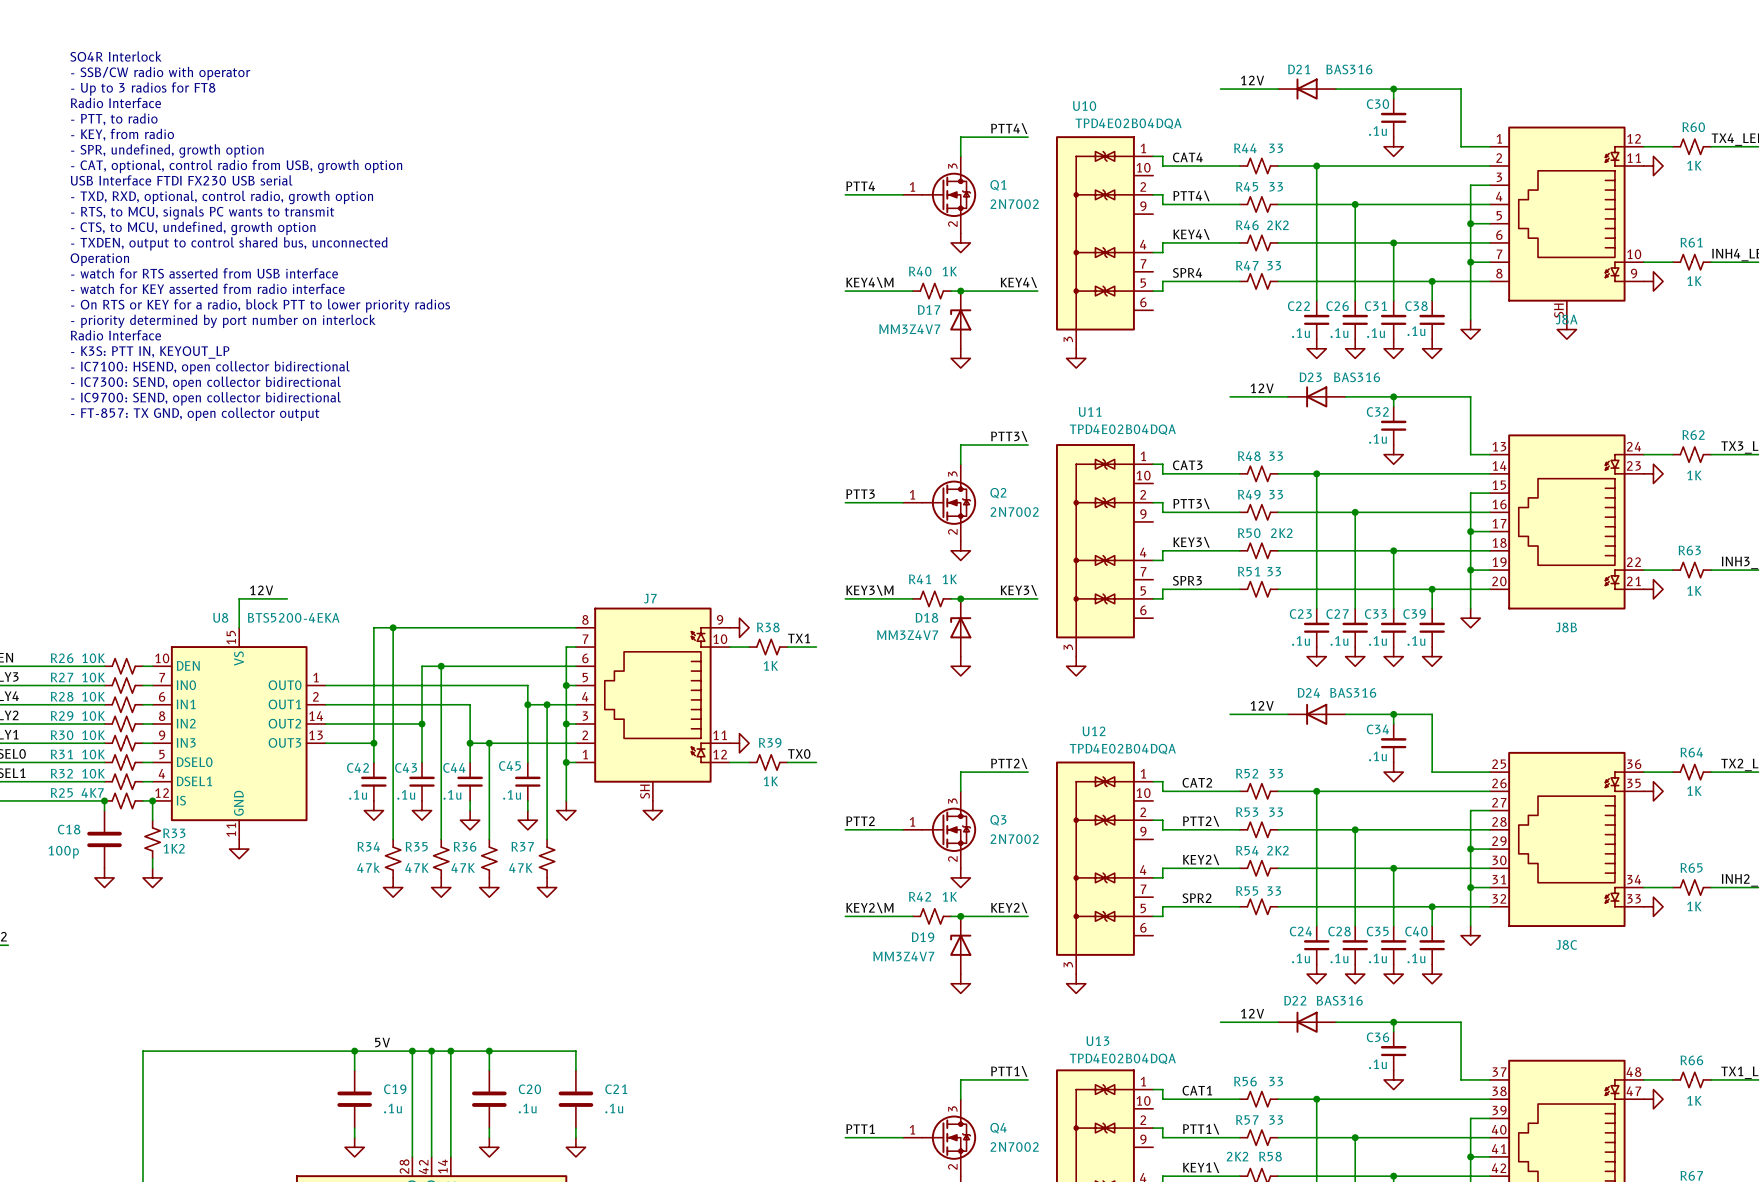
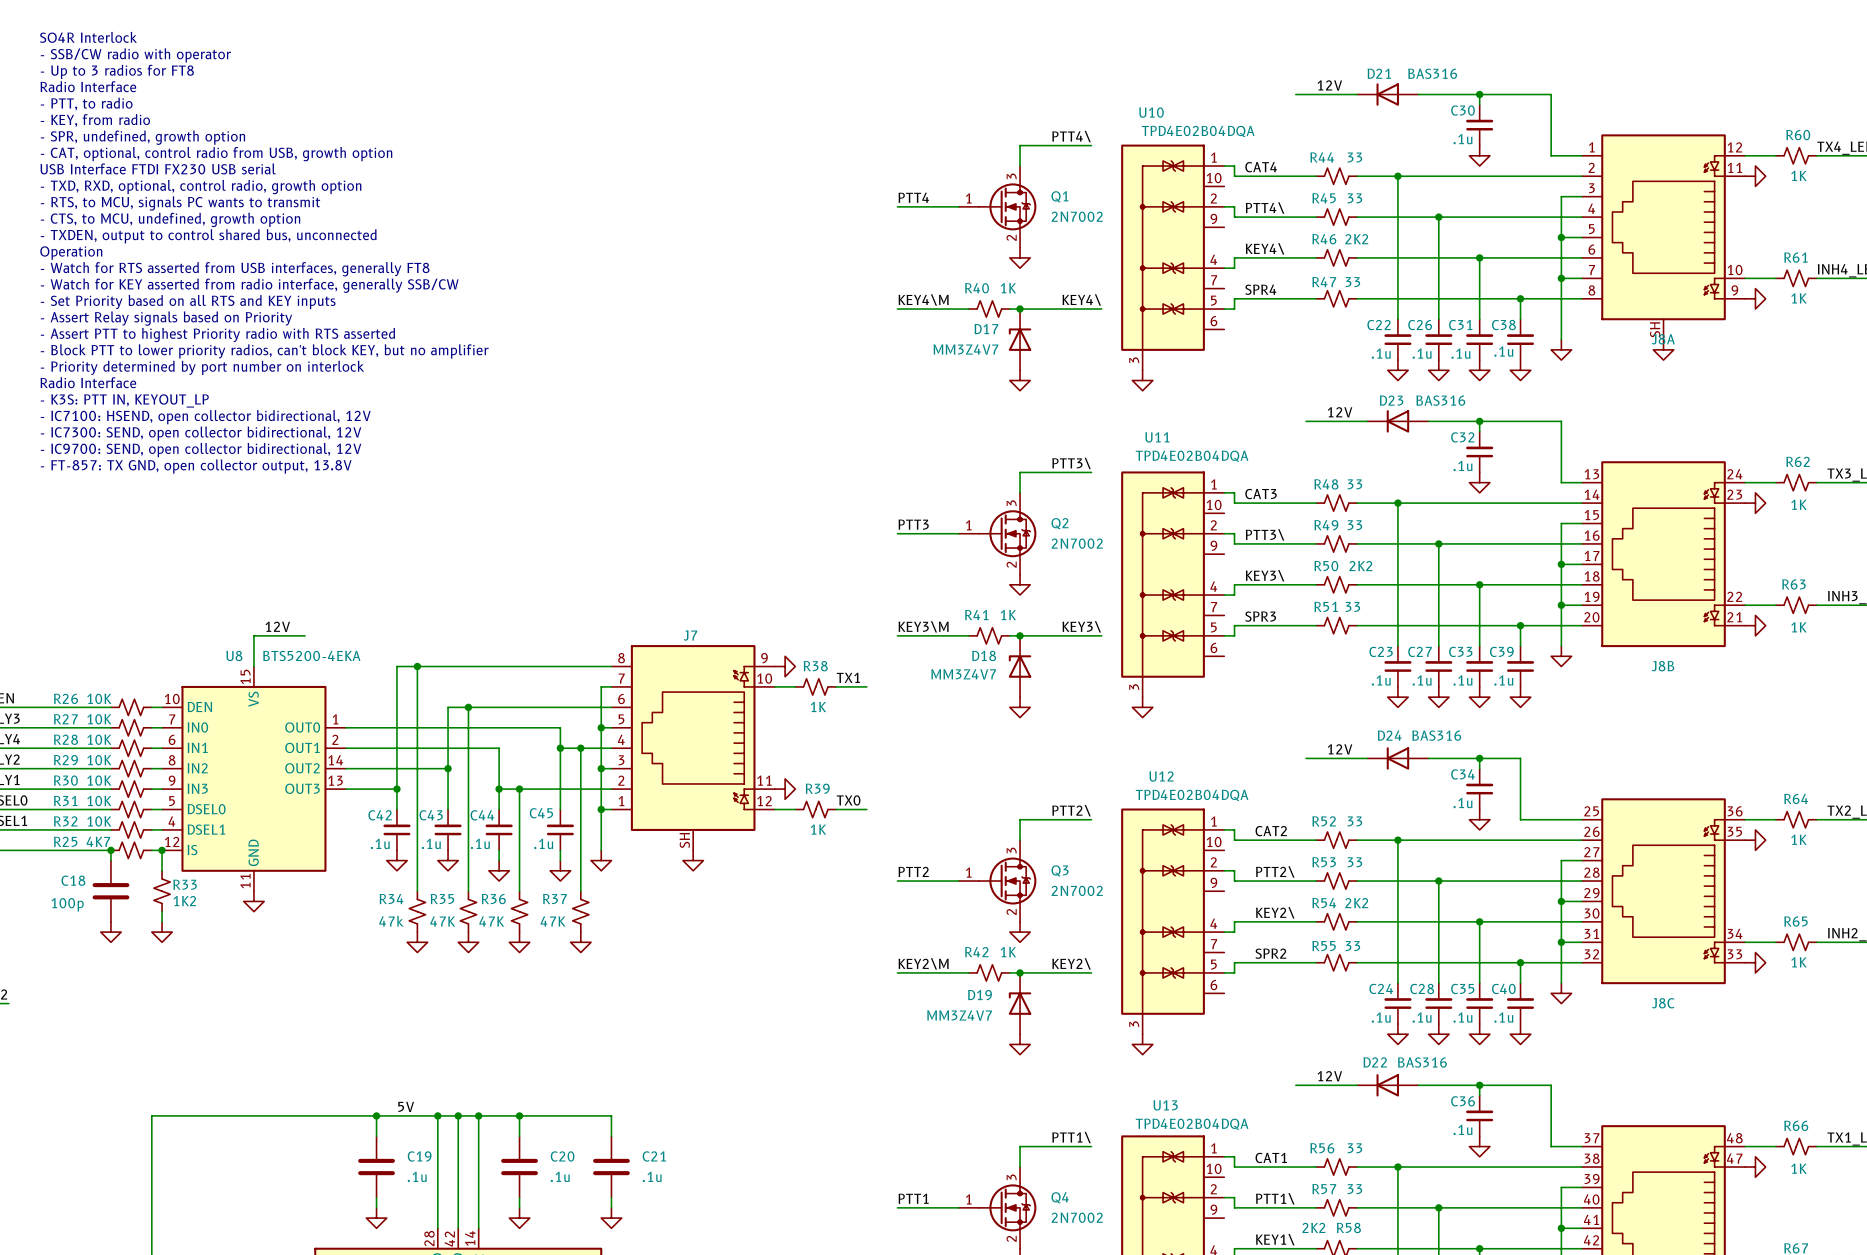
text position: SO4R Interlock (116, 56) -> SO4R Interlock (88, 37)
text position: - SSB/CW radio with operator (160, 73) -> - SSB/CW radio with operator (135, 55)
text position: - Up to 3 radios for FT8 (143, 89) -> - Up to 3 radios for FT8 (117, 71)
text position: Radio Interface (115, 102) -> Radio Interface (88, 86)
text position: - PTT, to radio (114, 119) -> - PTT, to radio (86, 104)
text position: - KEY, from radio (122, 134) -> - KEY, from radio (95, 120)
text position: - SPR, undefined, growth option (167, 151) -> - SPR, undefined, growth option (142, 137)
text position: - CAT, optional, control radio from USB, growth option (236, 166) -> - CAT, optional, control radio from USB, growth option (216, 154)
text position: USB Interface FTDI FX230 USB serial (181, 180) -> USB Interface FTDI FX230 USB serial (158, 168)
text position: - TXD, RXD, optional, control radio, growth option (222, 197) -> - TXD, RXD, optional, control radio, growth option (201, 187)
text position: - RTS, to MCU, signals PC wants to transmit (202, 212) -> - RTS, to MCU, signals PC wants to transmit (180, 203)
text position: - CTS, to MCU, undefined, growth option (193, 228) -> - CTS, to MCU, undefined, growth option (170, 219)
text position: - TXDEN, output to control shared bus, unconnected (229, 243) -> - TXDEN, output to control shared bus, unconnected (208, 236)
text: none -> - Watch for RTS asserted from USB interfaces, generally FT8 (235, 269)
text position: Operation (99, 259) -> Operation (71, 253)
text: - watch for RTS asserted from USB interface (204, 273) -> - Watch for KEY asserted from radio interface, generally SSB/CW (249, 285)
text: none -> - Set Priority based on all RTS and KEY inputs (188, 302)
text: - watch for KEY asserted from radio interface (207, 288) -> none
text: none -> - Assert Relay signals based on Priority (166, 318)
text: - On RTS or KEY for a radio, block PTT to lower priority radios (260, 305) -> none
text: none -> - Assert PTT to highest Priority radio with RTS asserted (217, 335)
text: - priority determined by port number on interlock (223, 321) -> none
text: none -> - Block PTT to lower priority radios, can't block KEY, but no amplifier (264, 351)
text position: Radio Interface (115, 335) -> Radio Interface (88, 382)
text: none -> - Priority determined by port number on interlock (202, 367)
text position: - K3S: PTT IN, KEYOUT_LP (150, 352) -> - K3S: PTT IN, KEYOUT_LP (124, 400)
text: - IC7100: HSEND, open collector bidirectional (210, 367) -> none
text: - IC7300: SEND, open collector bidirectional (206, 383) -> none
text: none -> - IC7100: HSEND, open collector bidirectional, 12V (205, 417)
text: - IC9700: SEND, open collector bidirectional (206, 398) -> none
text: none -> - IC7300: SEND, open collector bidirectional, 12V (201, 433)
text: - FT-857: TX GND, open collector output (195, 414) -> none
text: none -> - IC9700: SEND, open collector bidirectional, 12V (201, 450)
text: none -> - FT-857: TX GND, open collector output, 13.8V (196, 466)

